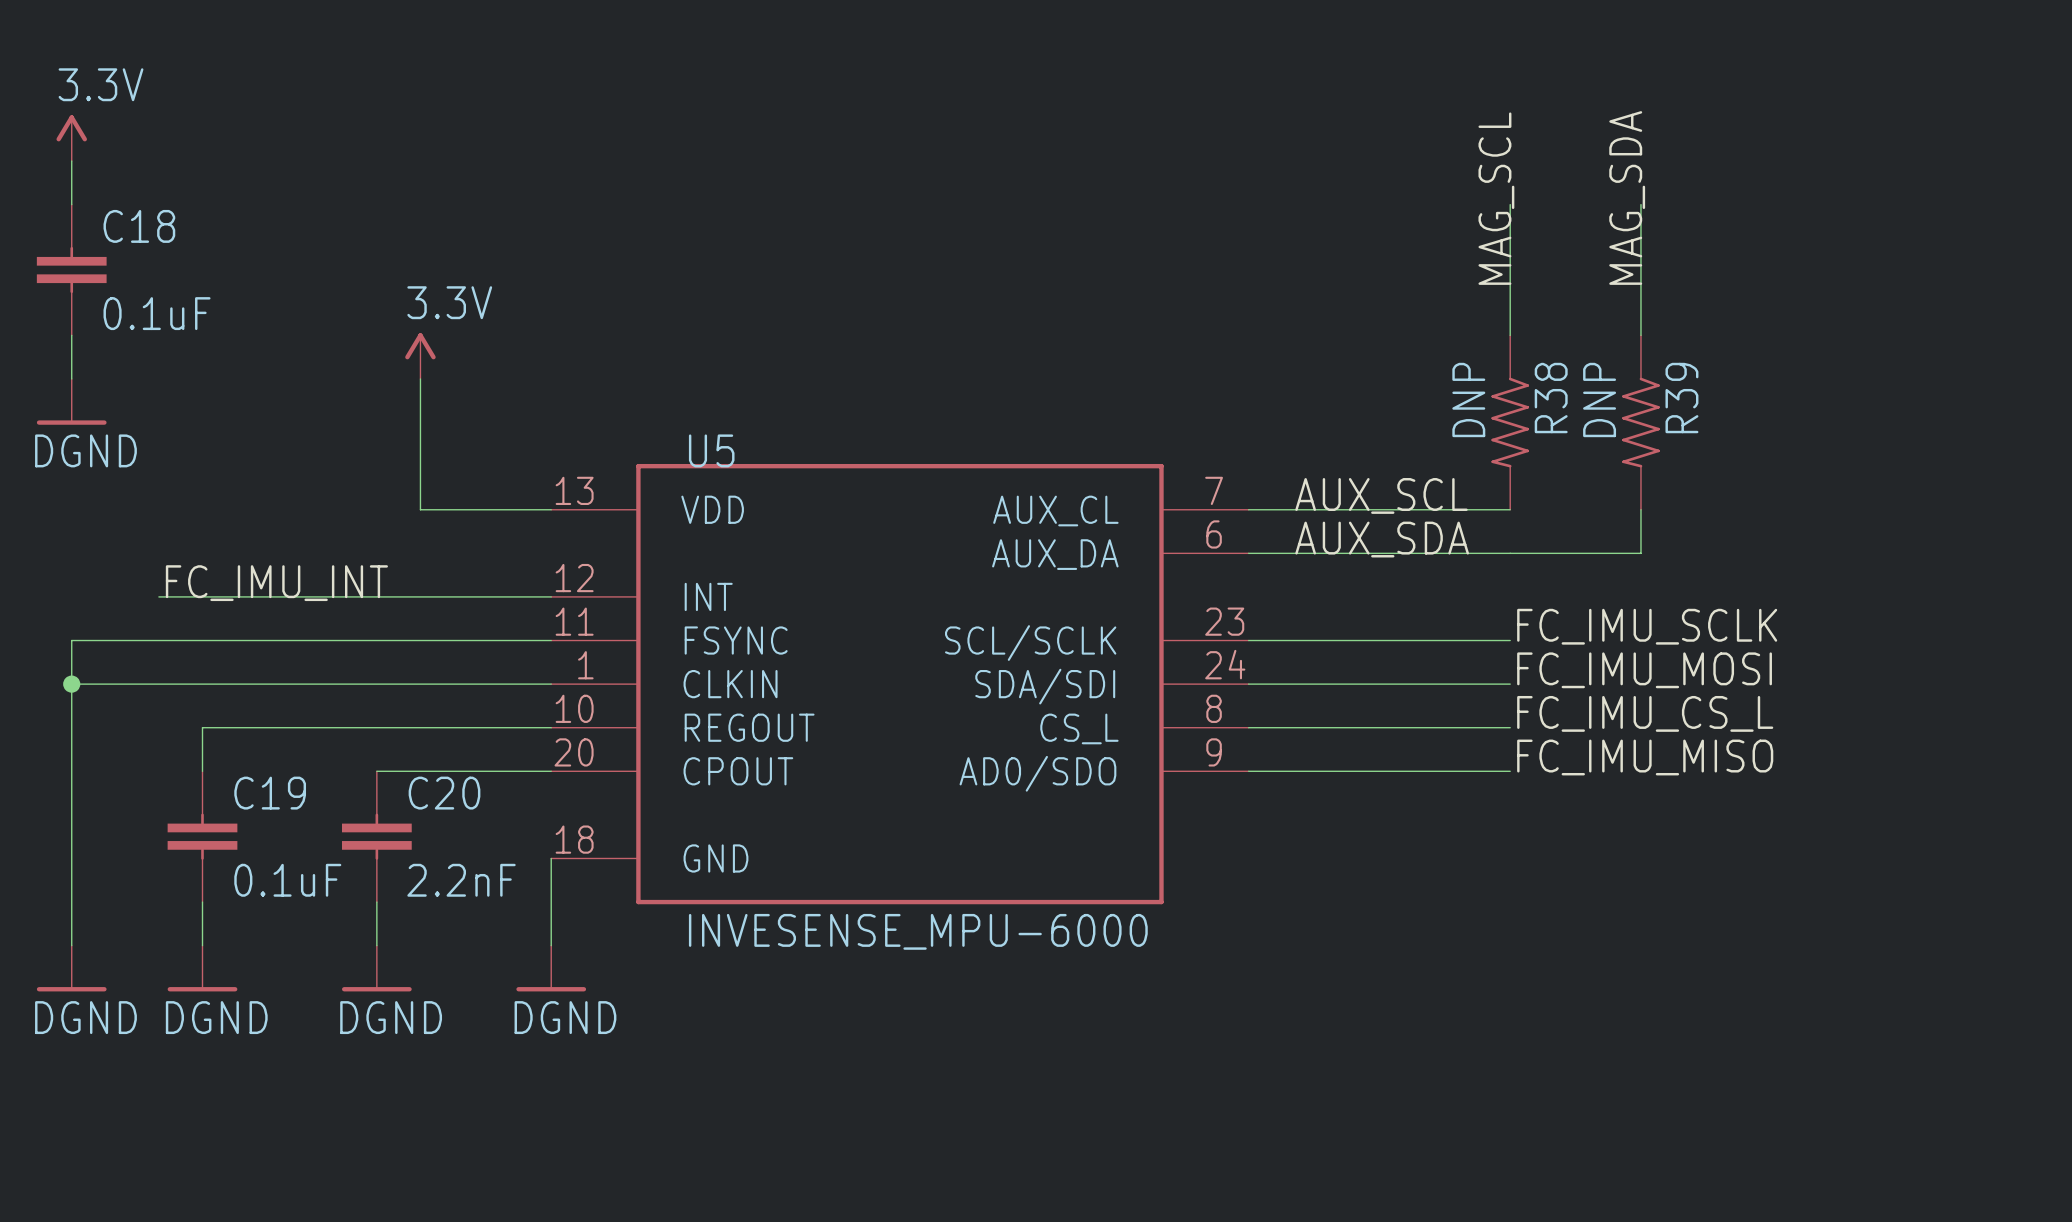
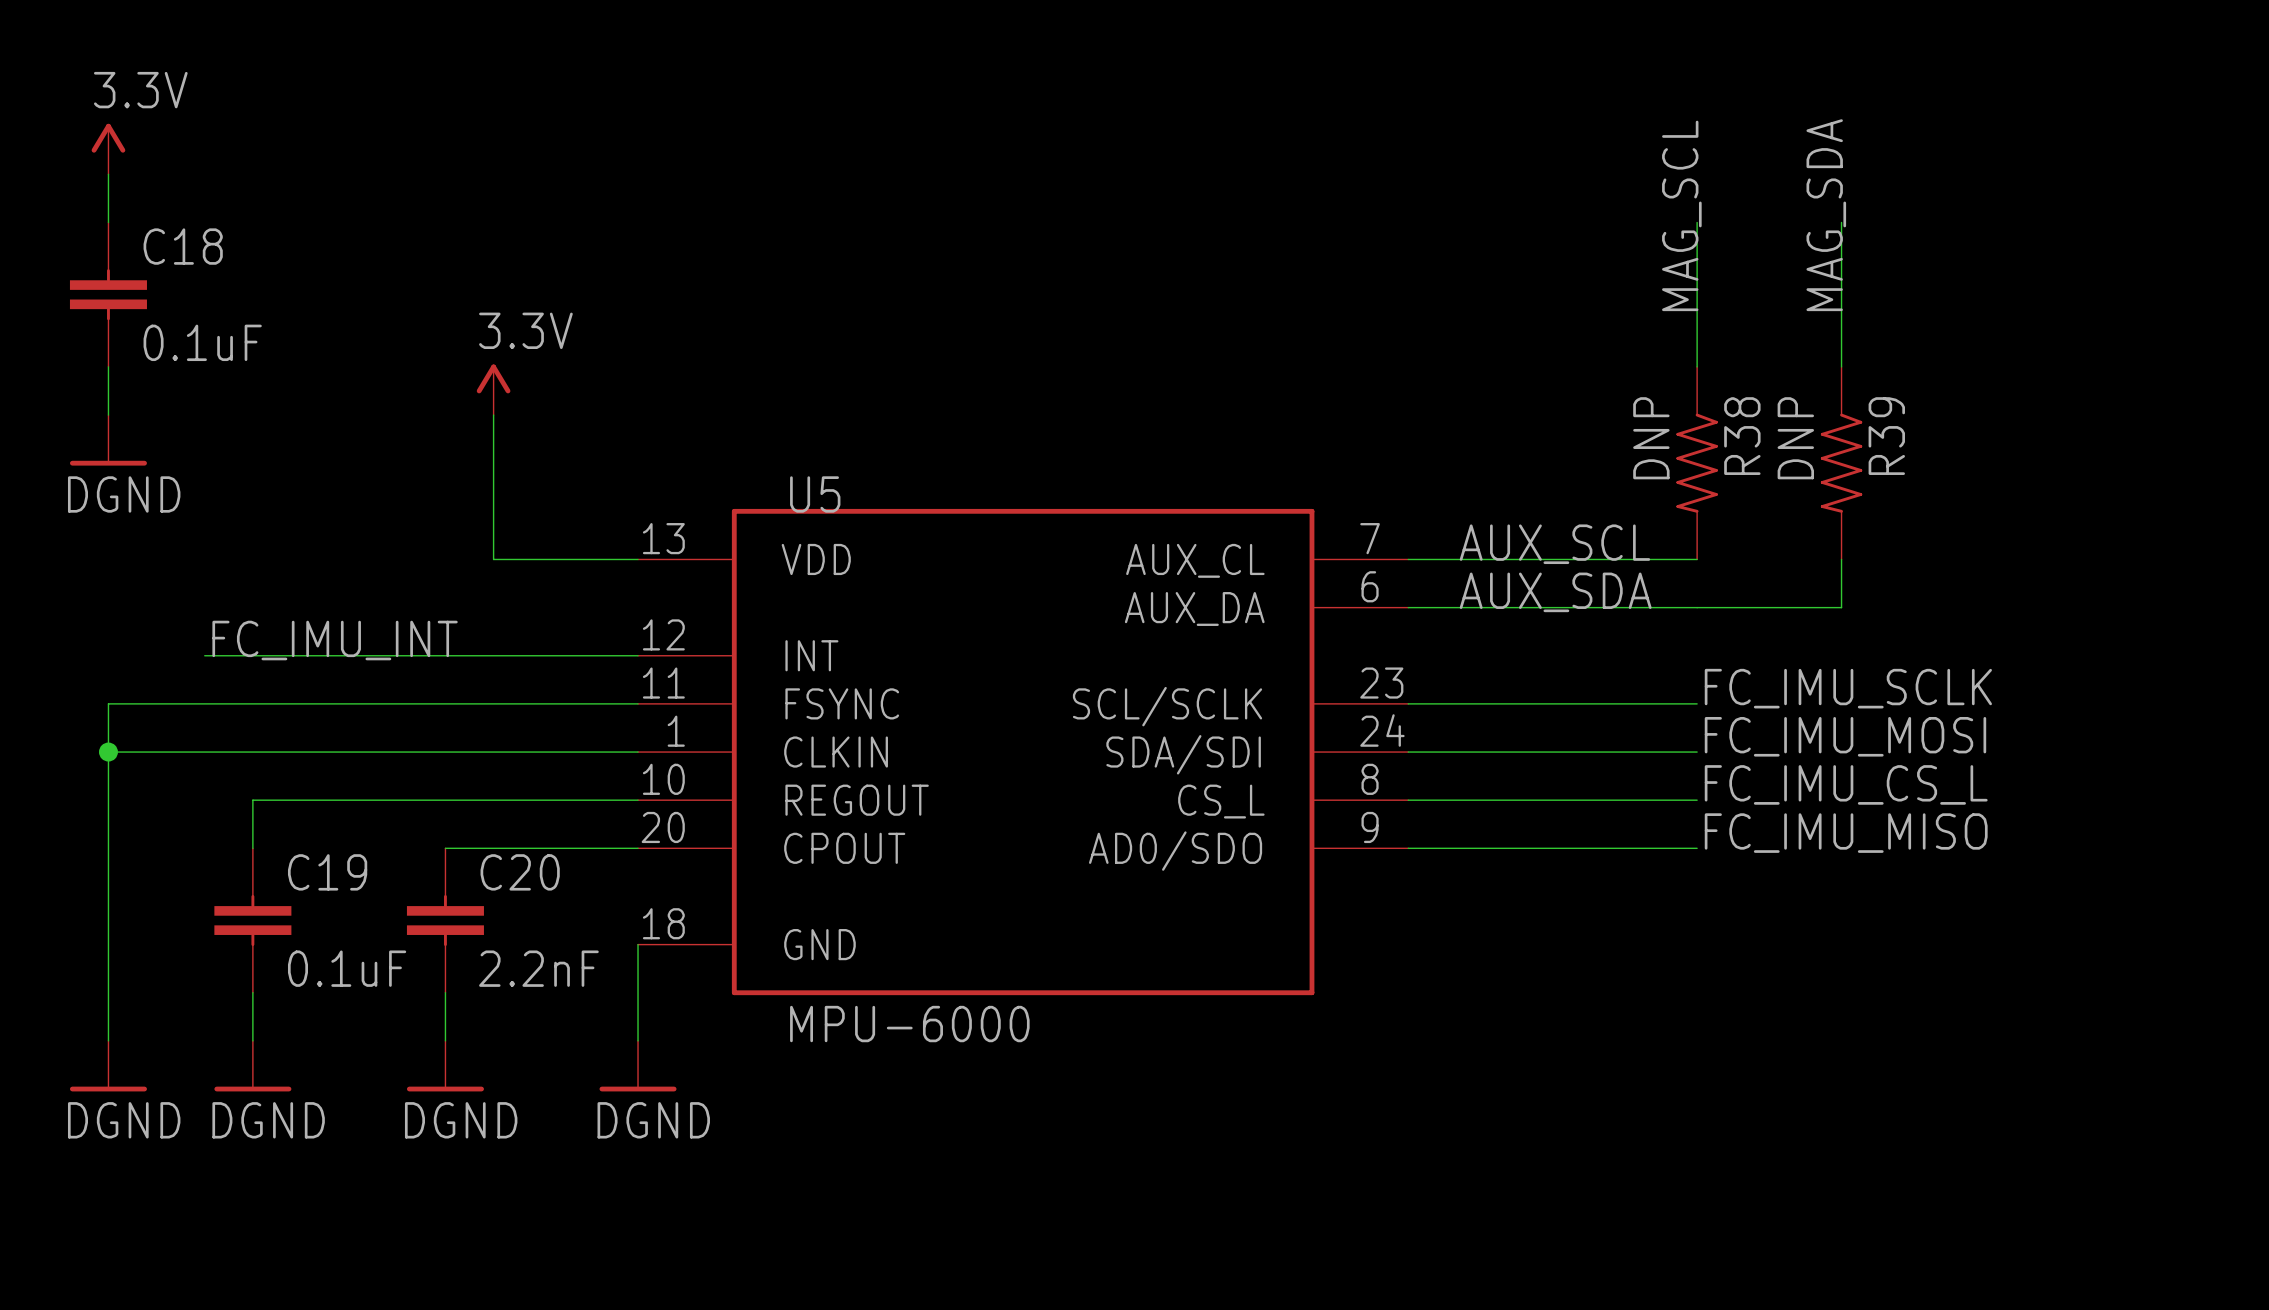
U5 value: INVESENSE_MPU-6000 (918, 931) -> MPU-6000 (909, 1024)

